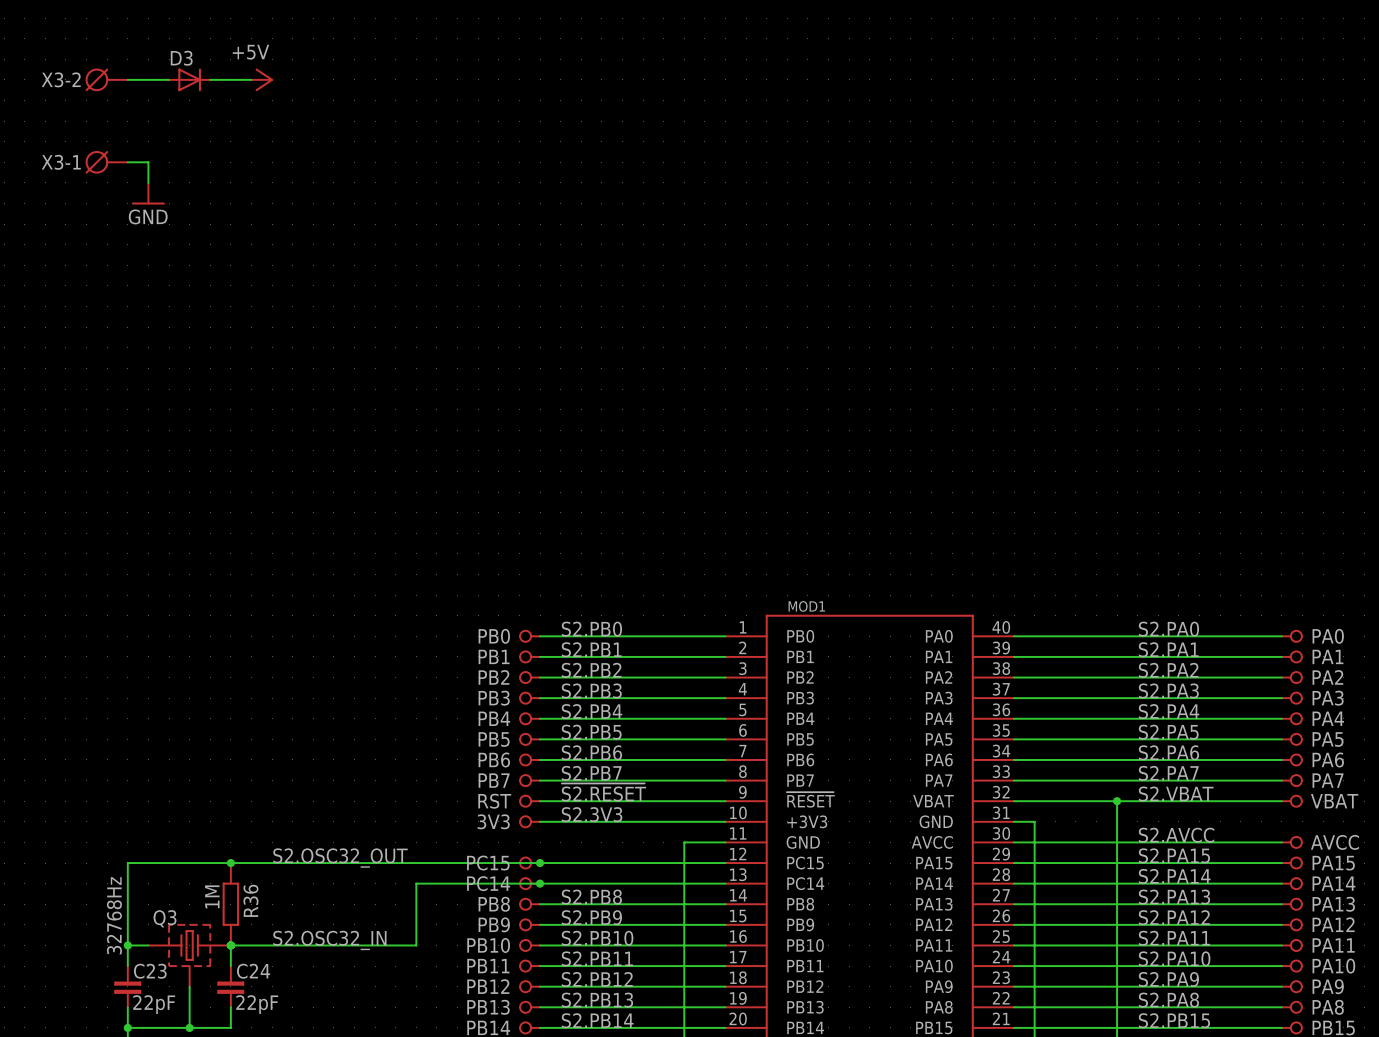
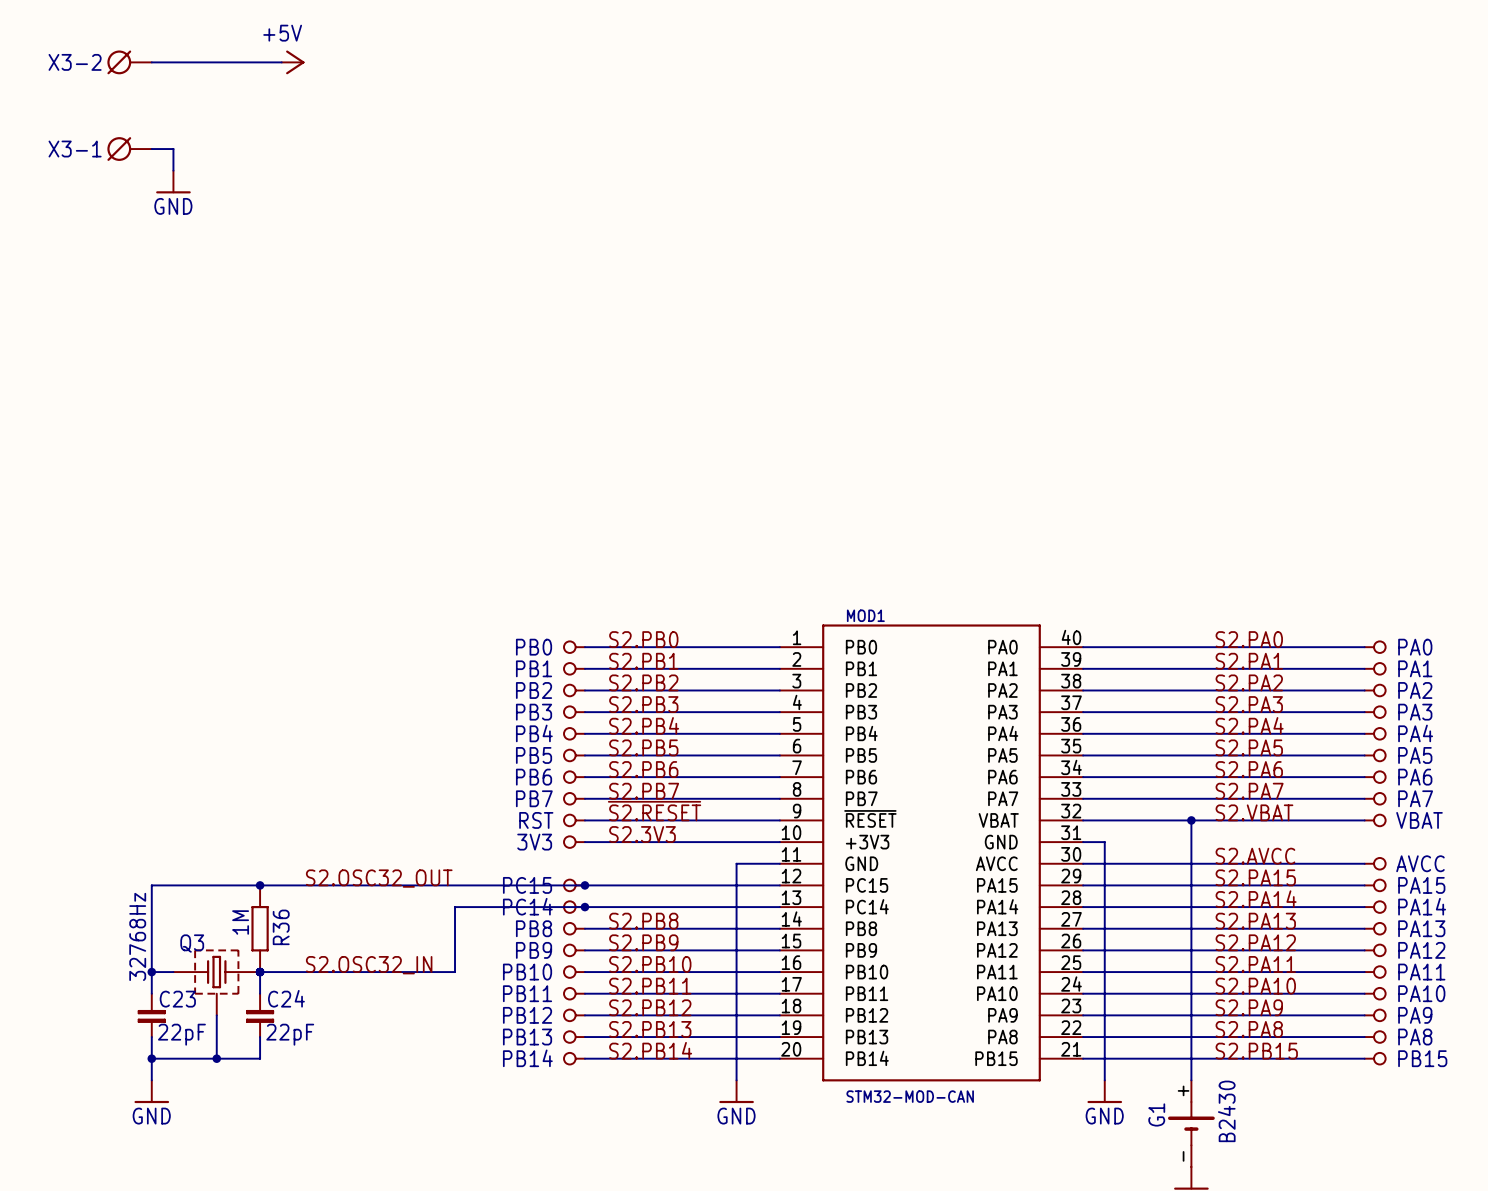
D3: (189, 79) -> none

